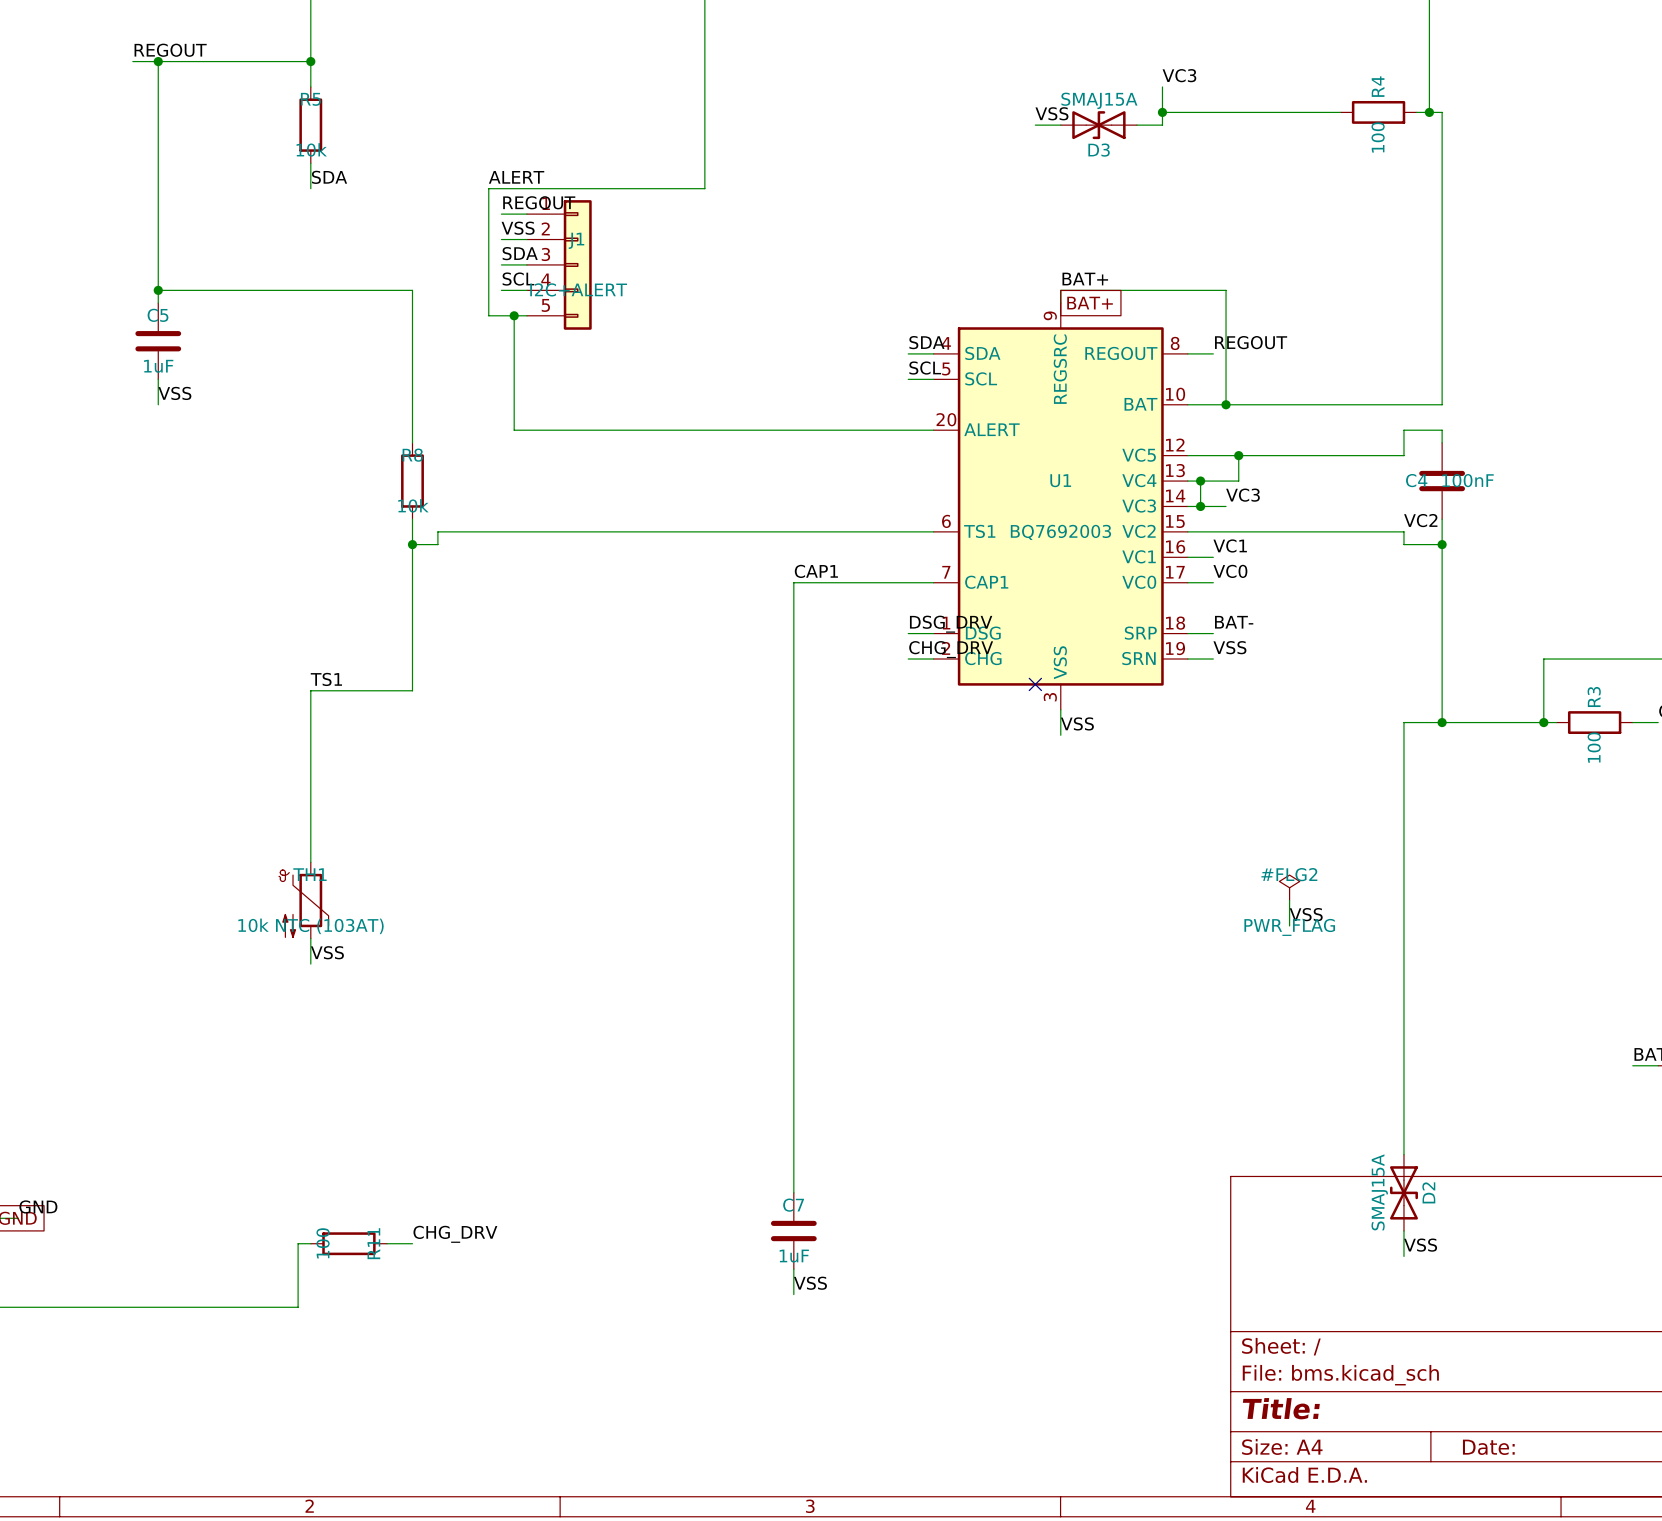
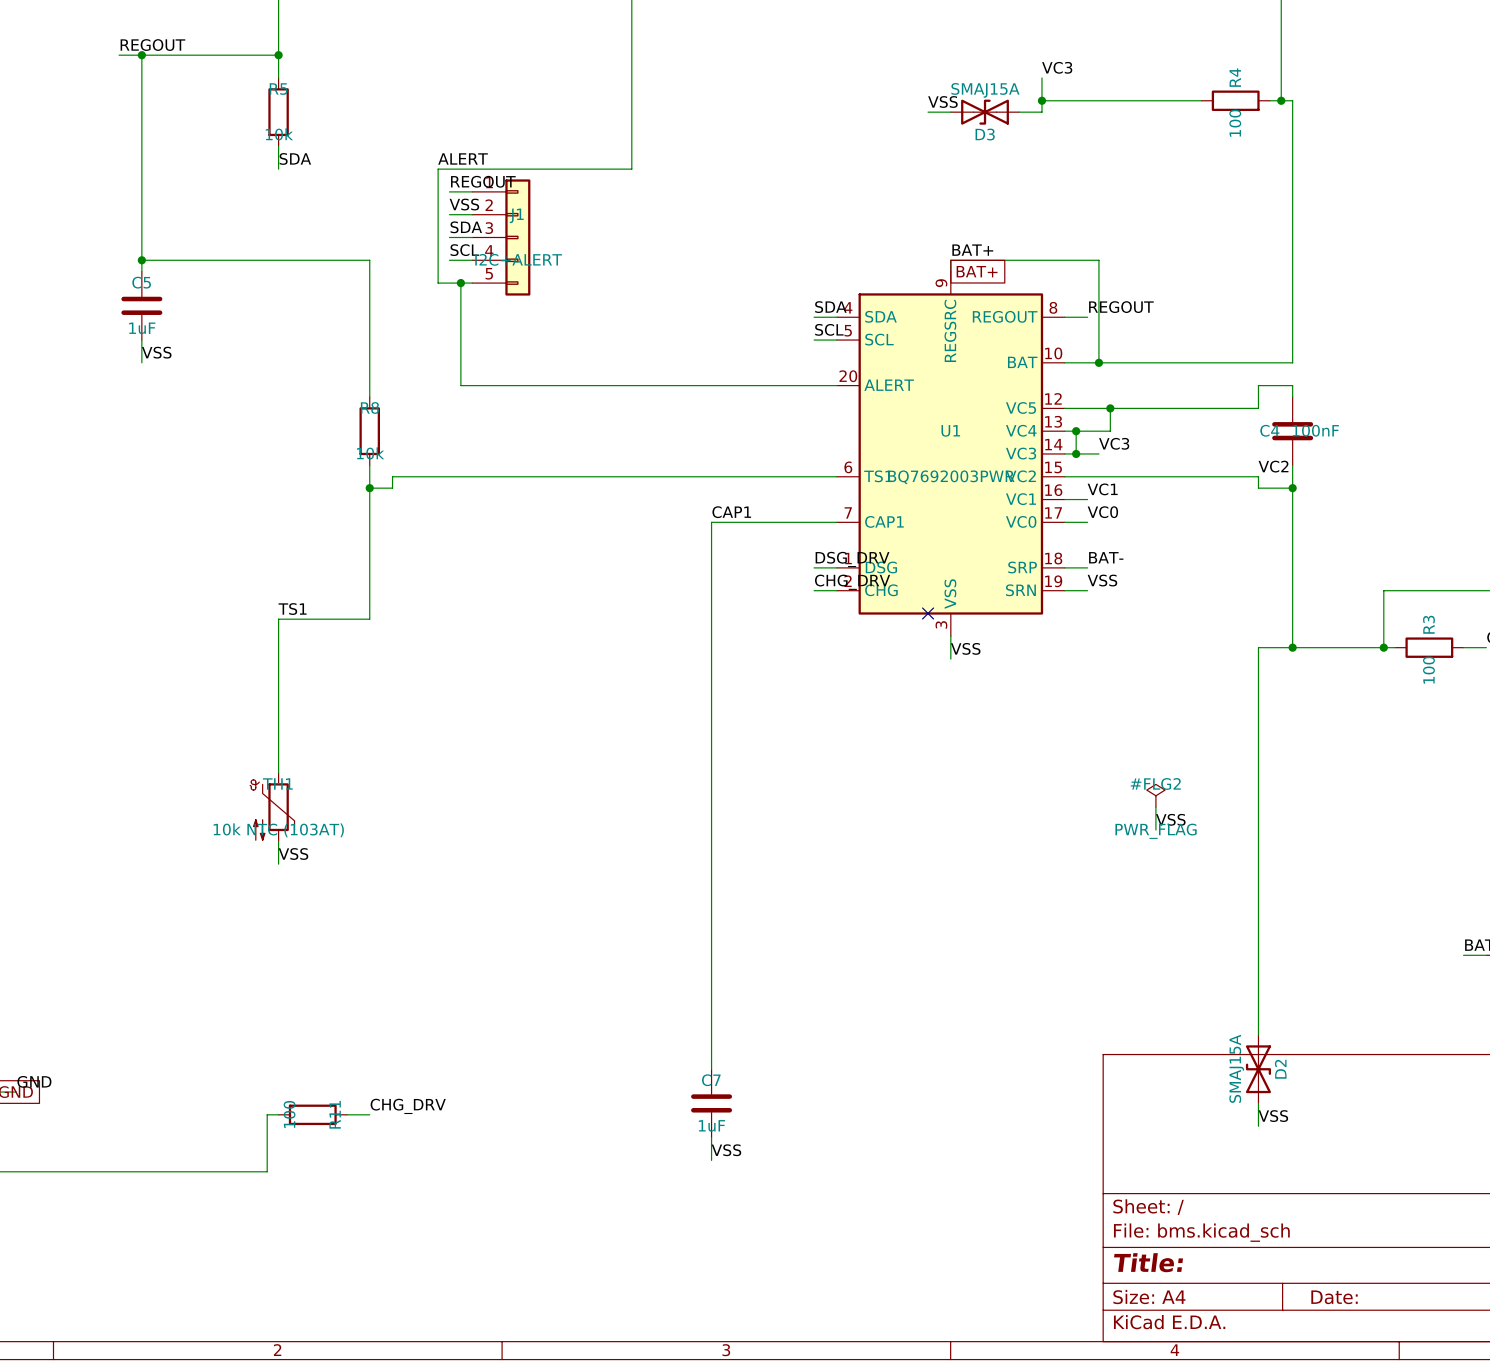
U1 value: BQ7692003 (1060, 532) -> BQ7692003PWR (951, 477)

